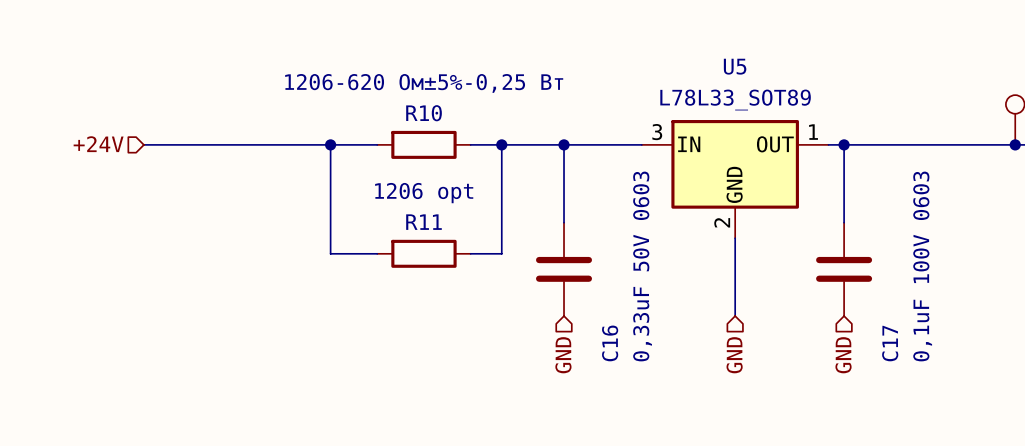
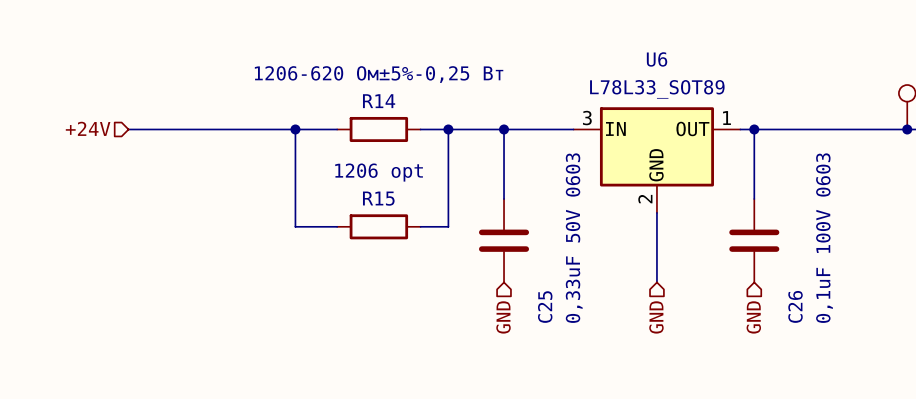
U5 name: U5 (735, 66) -> U6 (657, 59)
R10 name: R10 (424, 113) -> R14 (379, 101)
R11 name: R11 (423, 222) -> R15 (378, 198)
C16 name: C16 (610, 343) -> C25 (545, 307)
C17 name: C17 (890, 343) -> C26 (795, 306)

